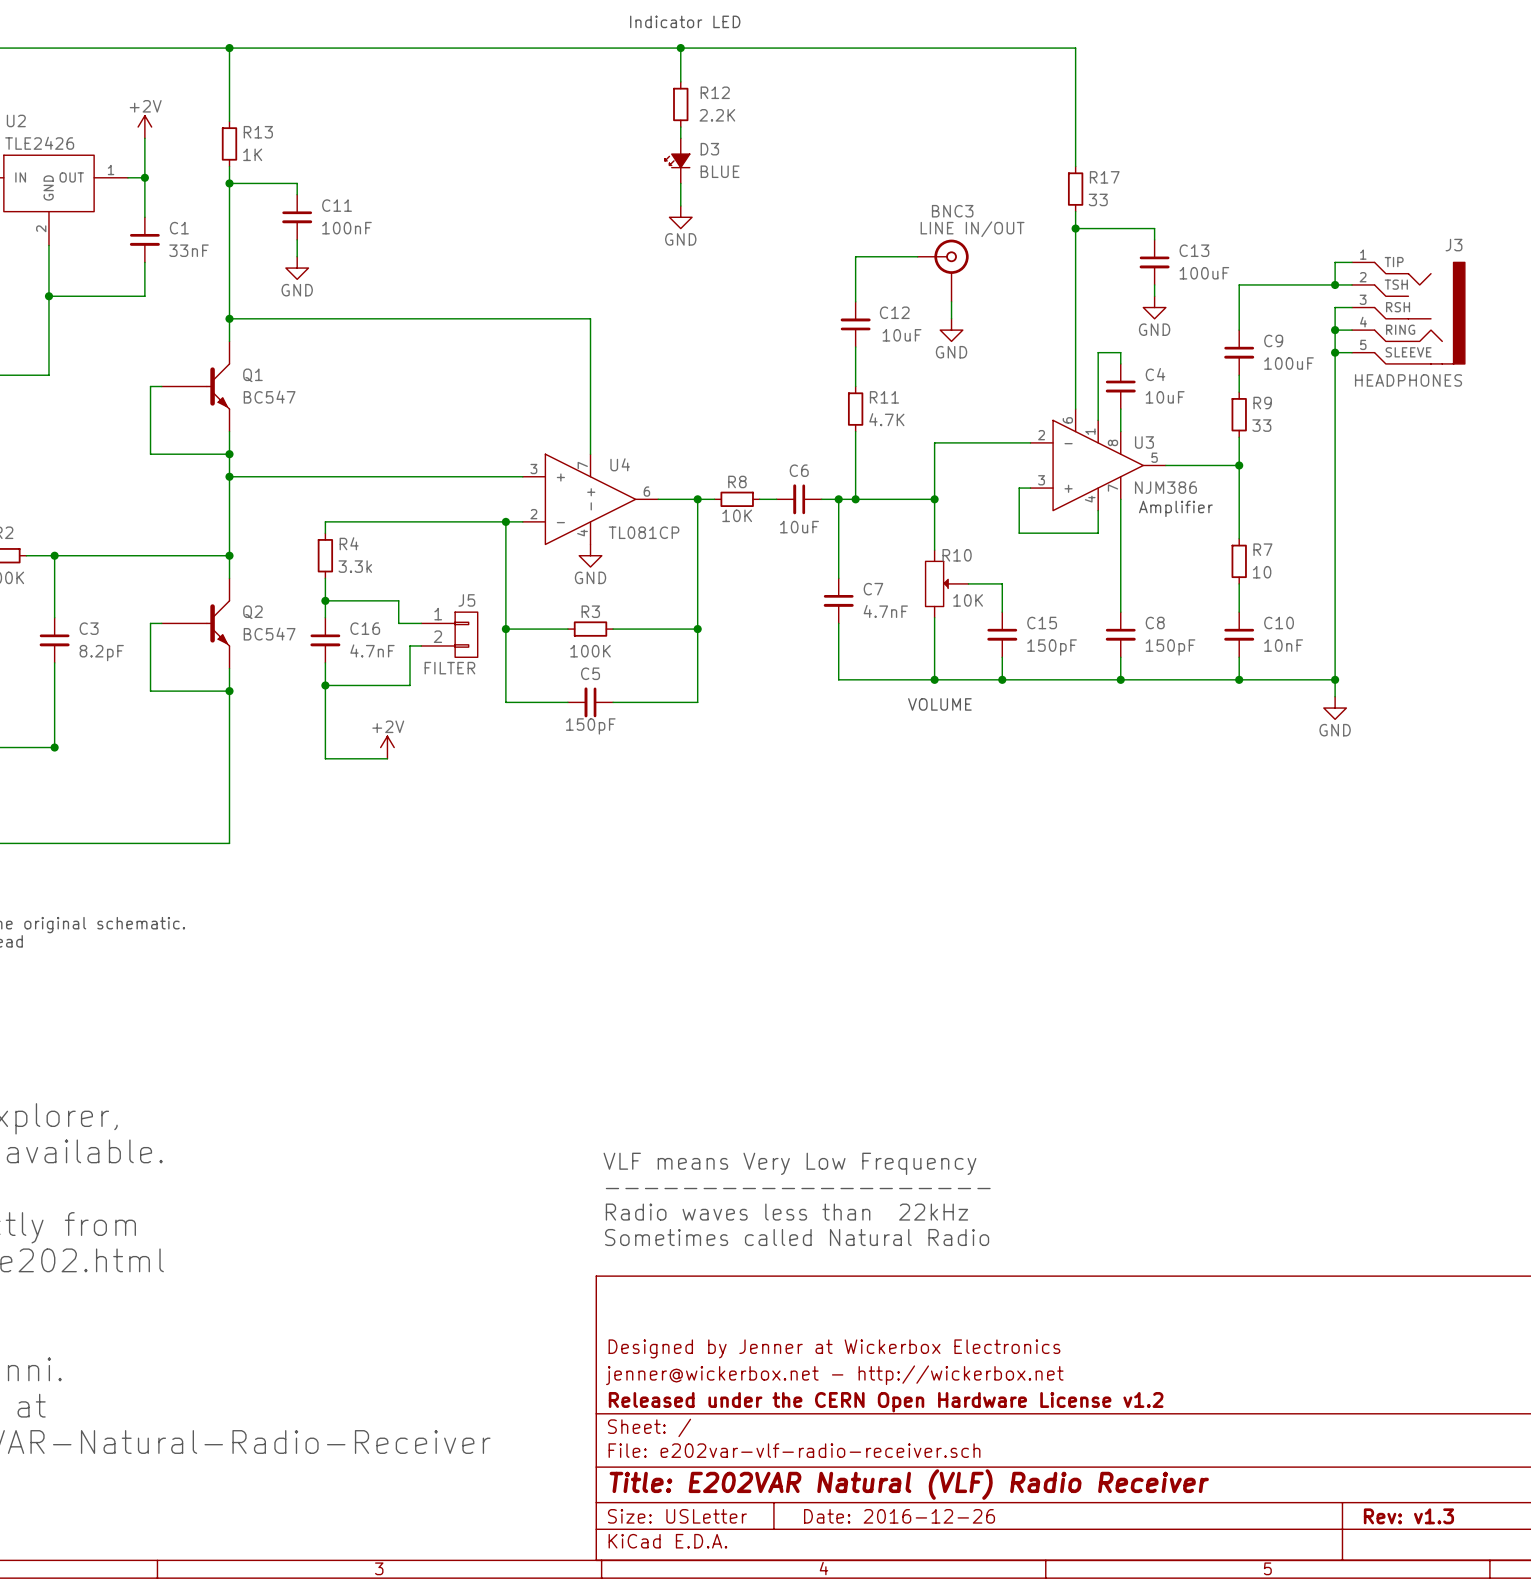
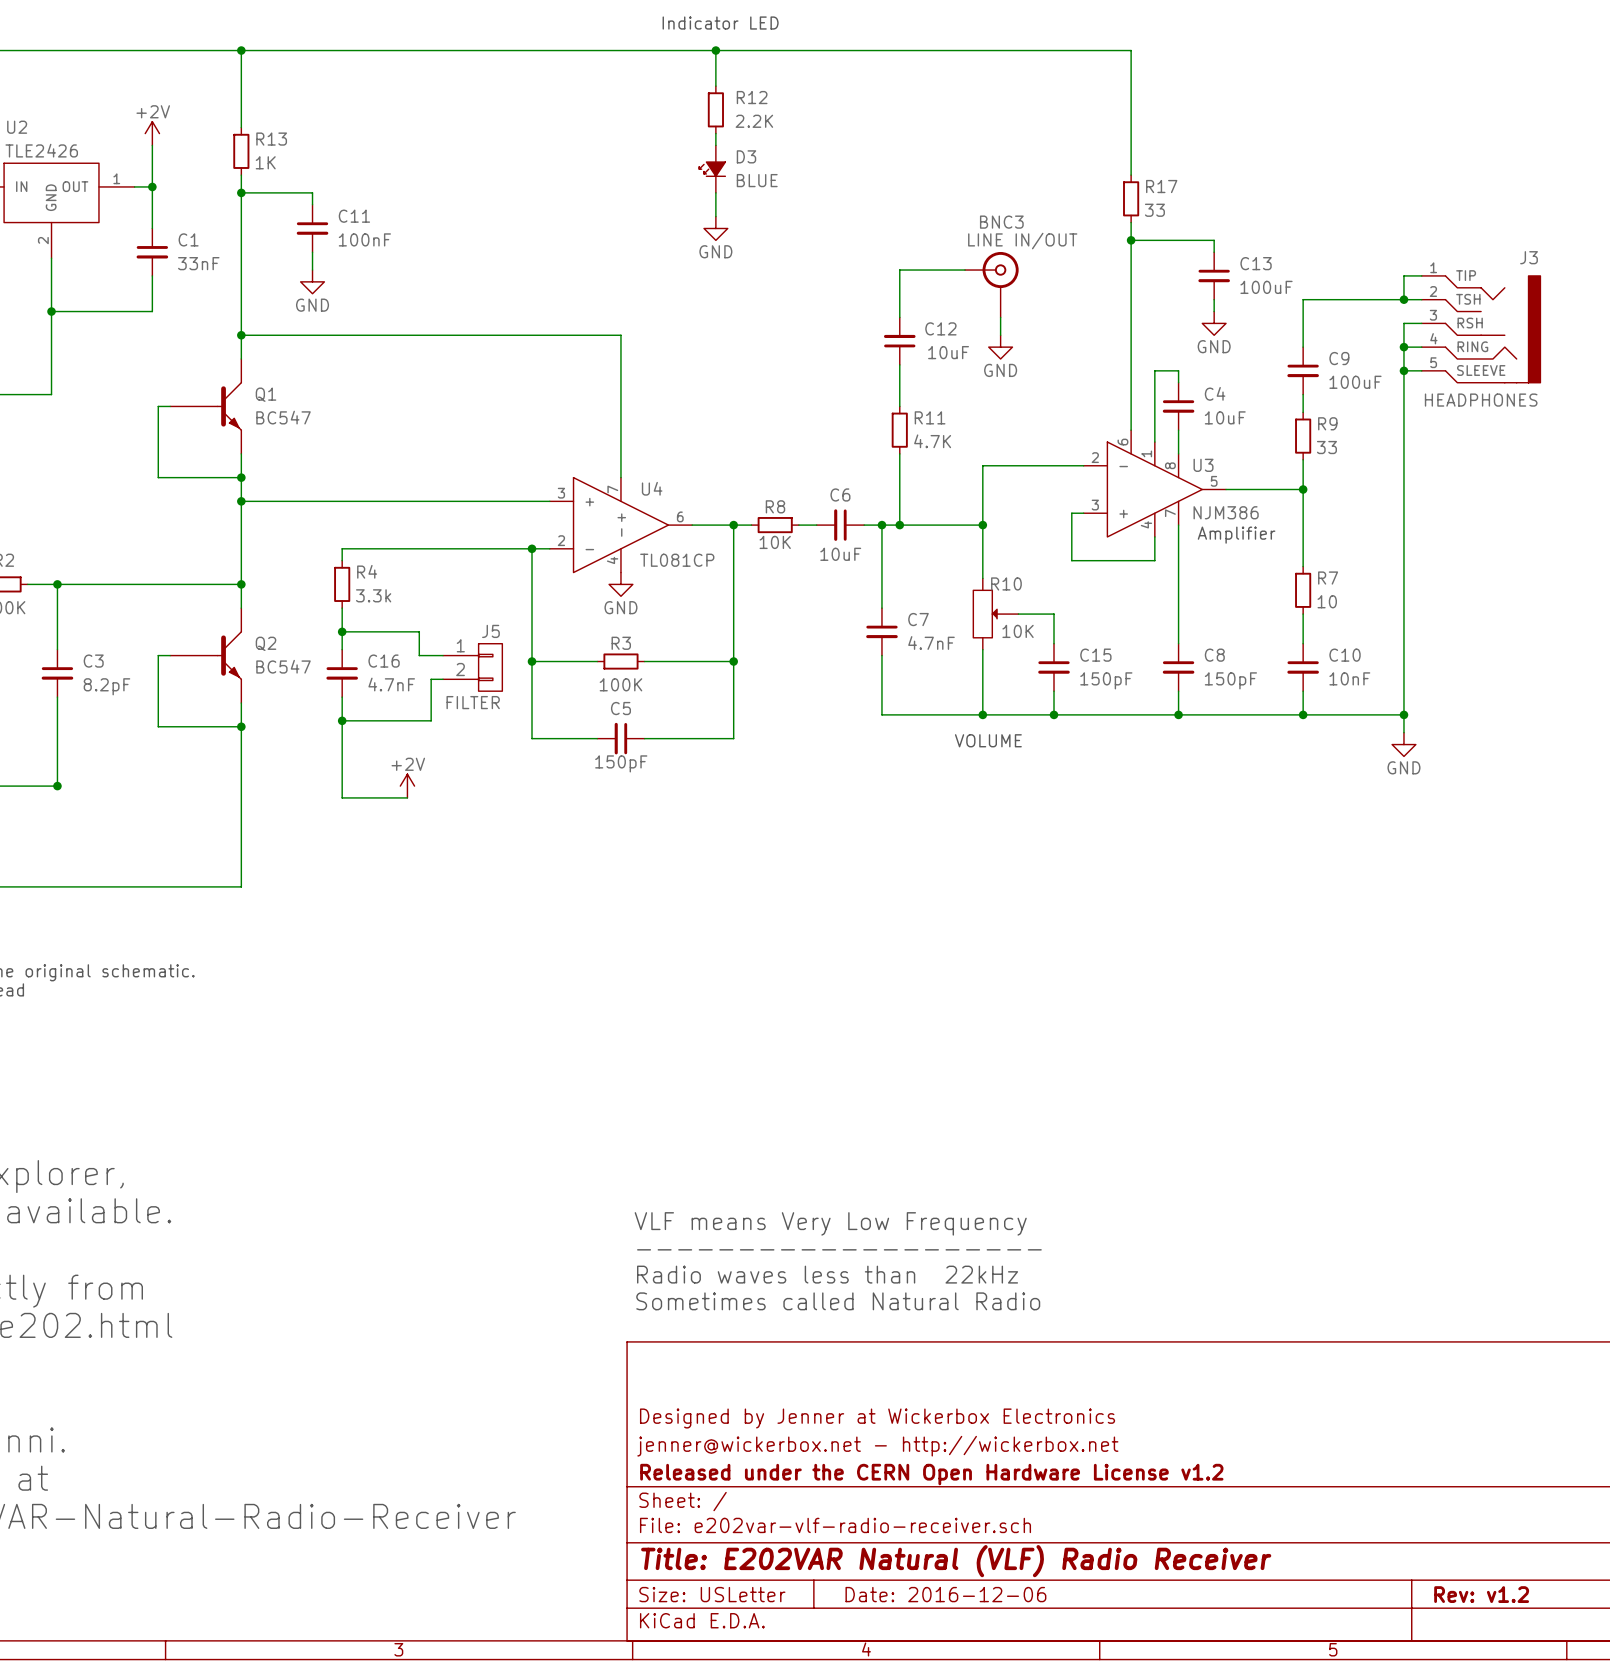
title block: Date: 2016-12-26 (899, 1516) -> Date: 2016-12-06 (945, 1594)
title block: Rev: v1.3 (1408, 1516) -> Rev: v1.2 (1481, 1594)

